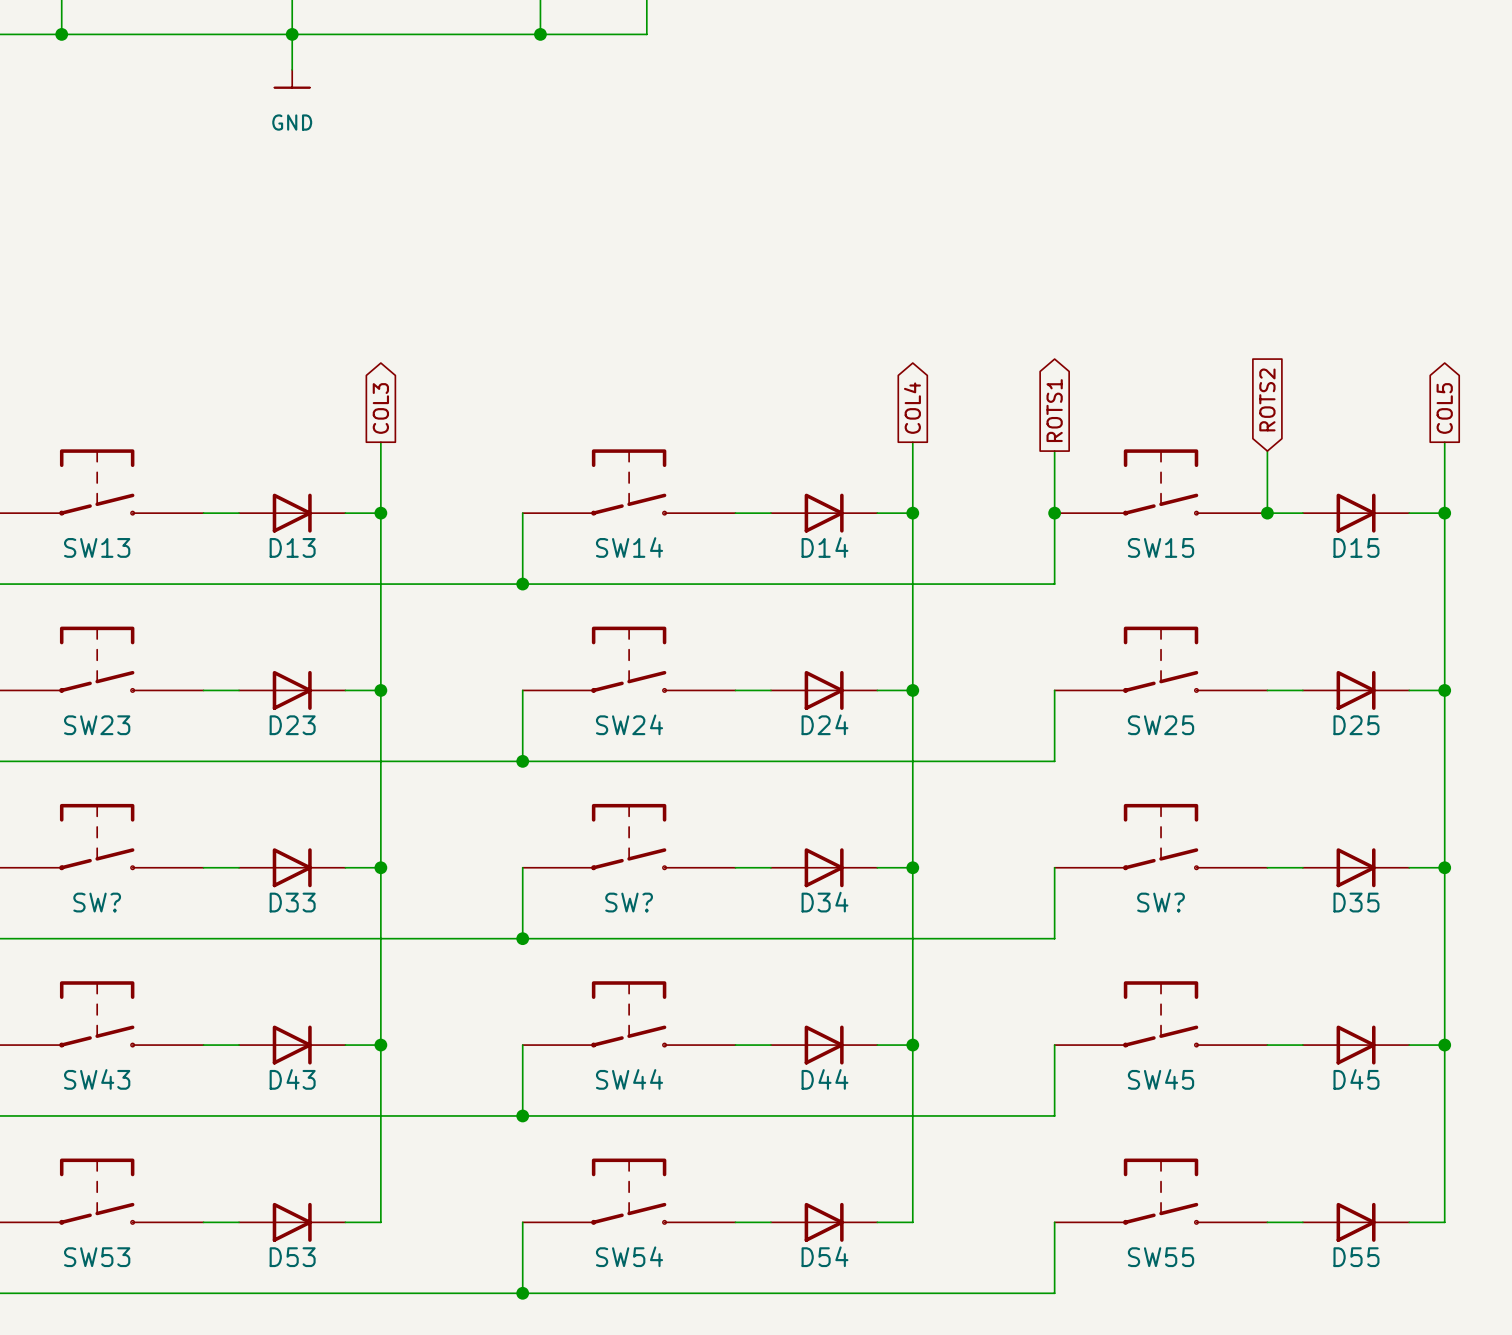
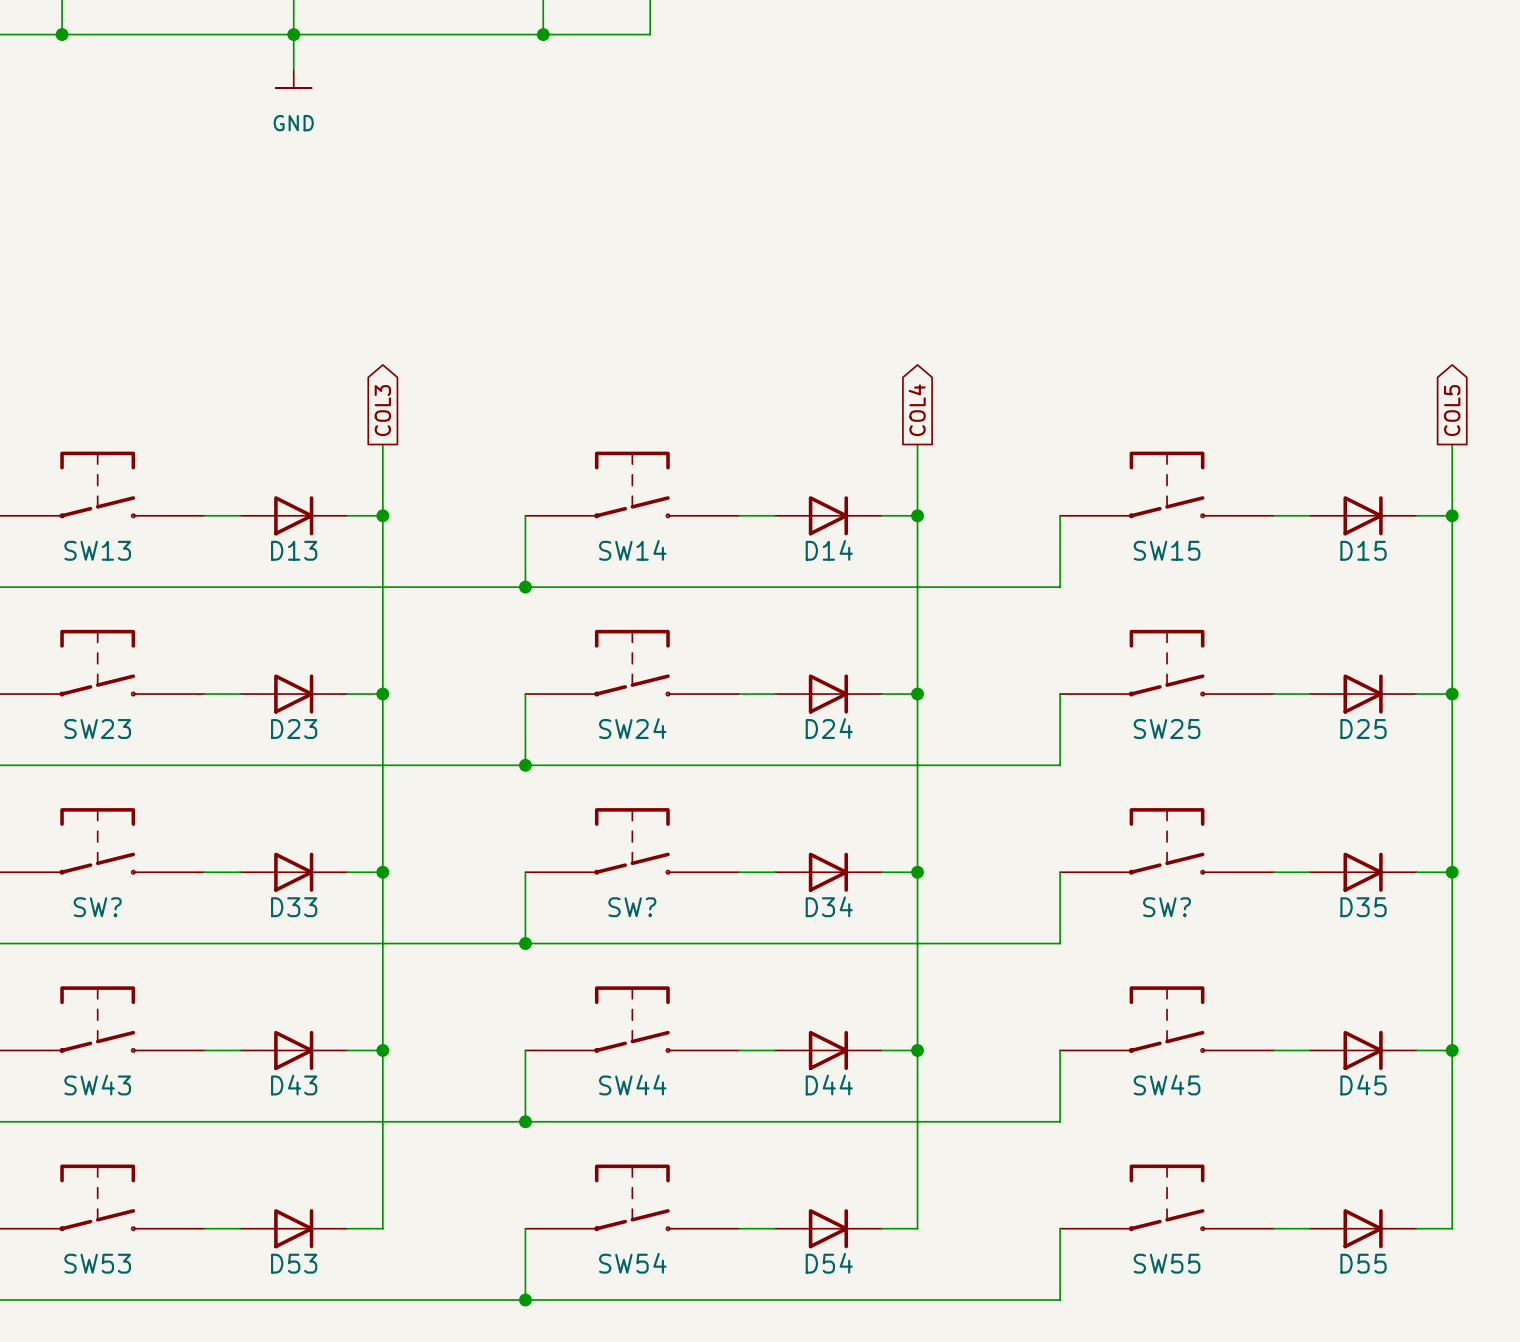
global label: ROTS2 (1267, 399) -> none
global label: ROTS1 (1054, 410) -> none
wire: (1054, 451) (1054, 513) -> none
wire: (1267, 451) (1267, 513) -> none
junction: (1054, 513) -> none
junction: (1267, 513) -> none

